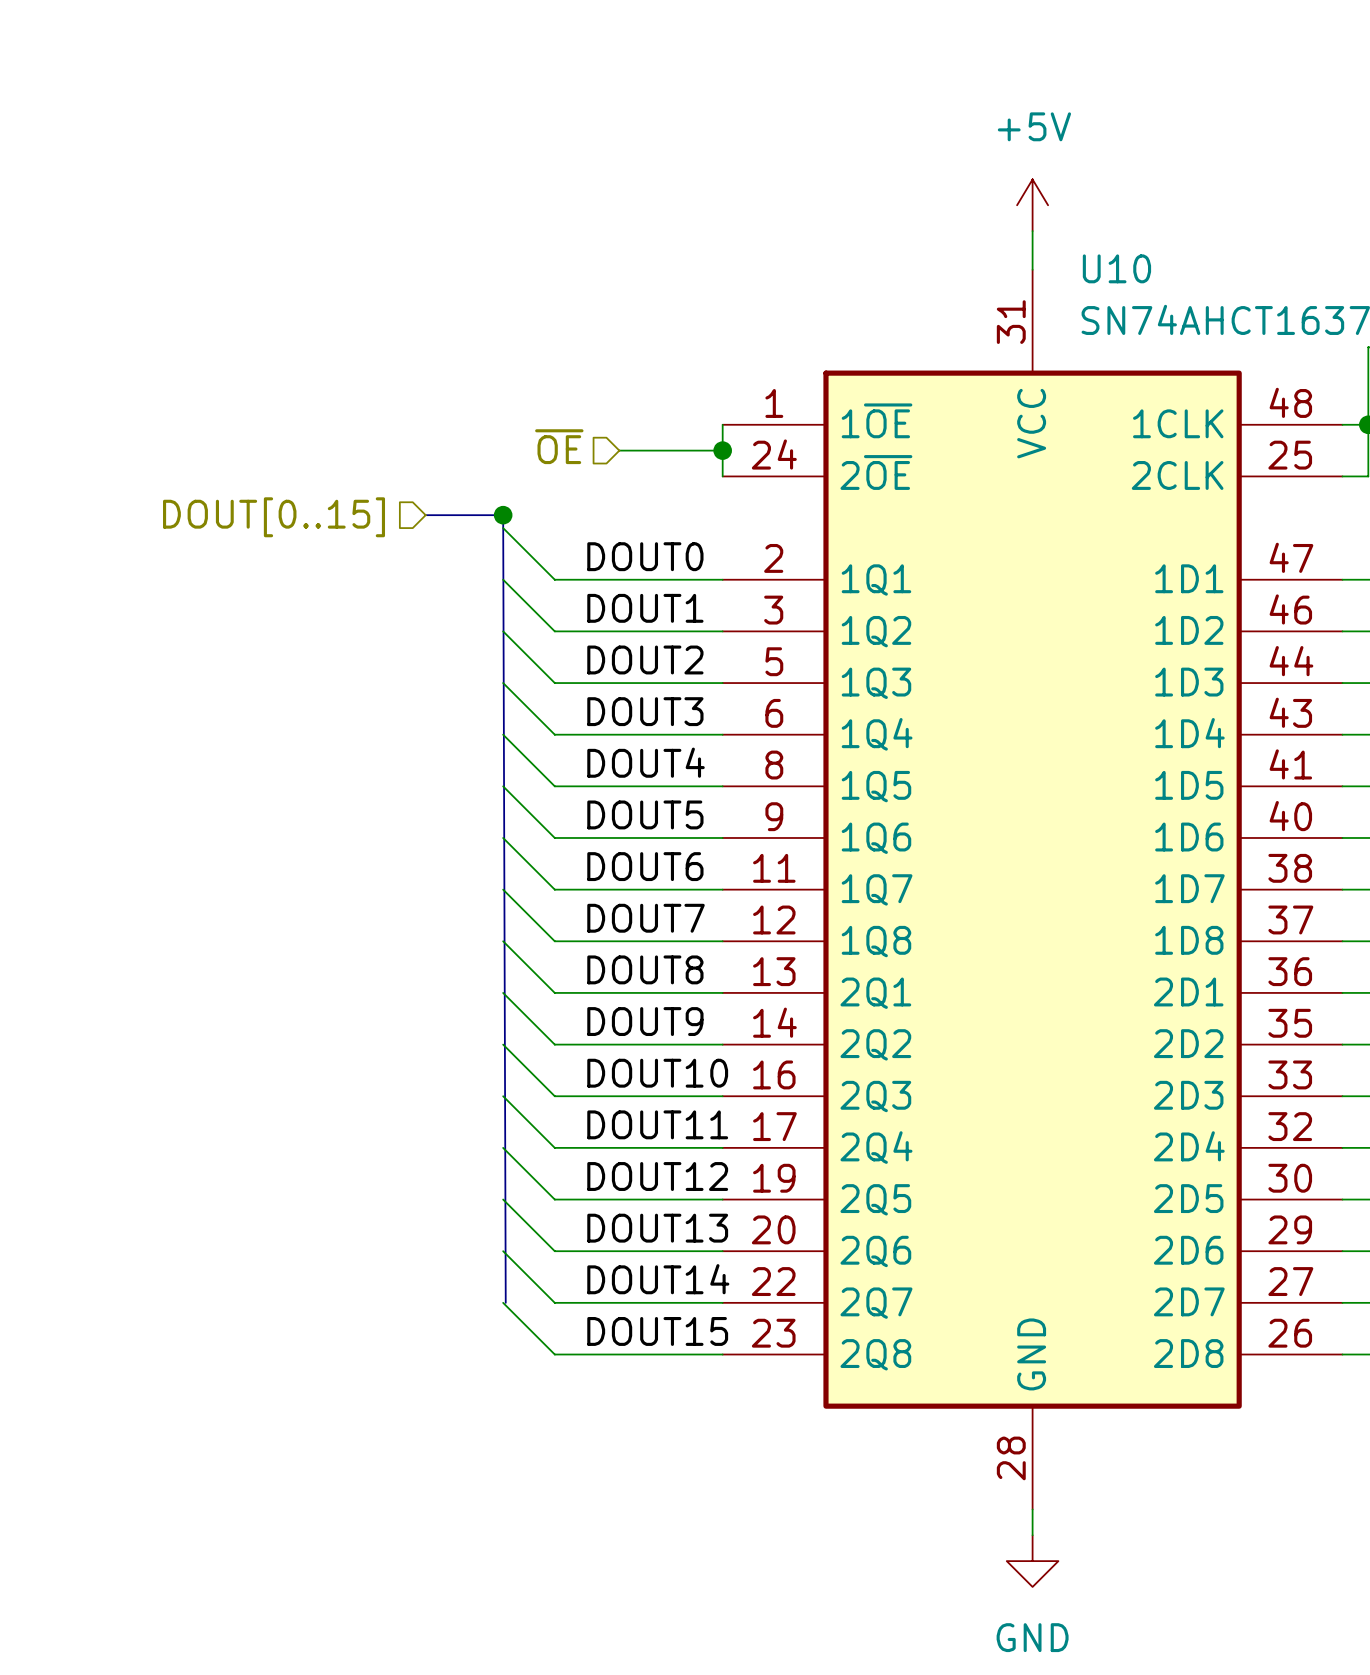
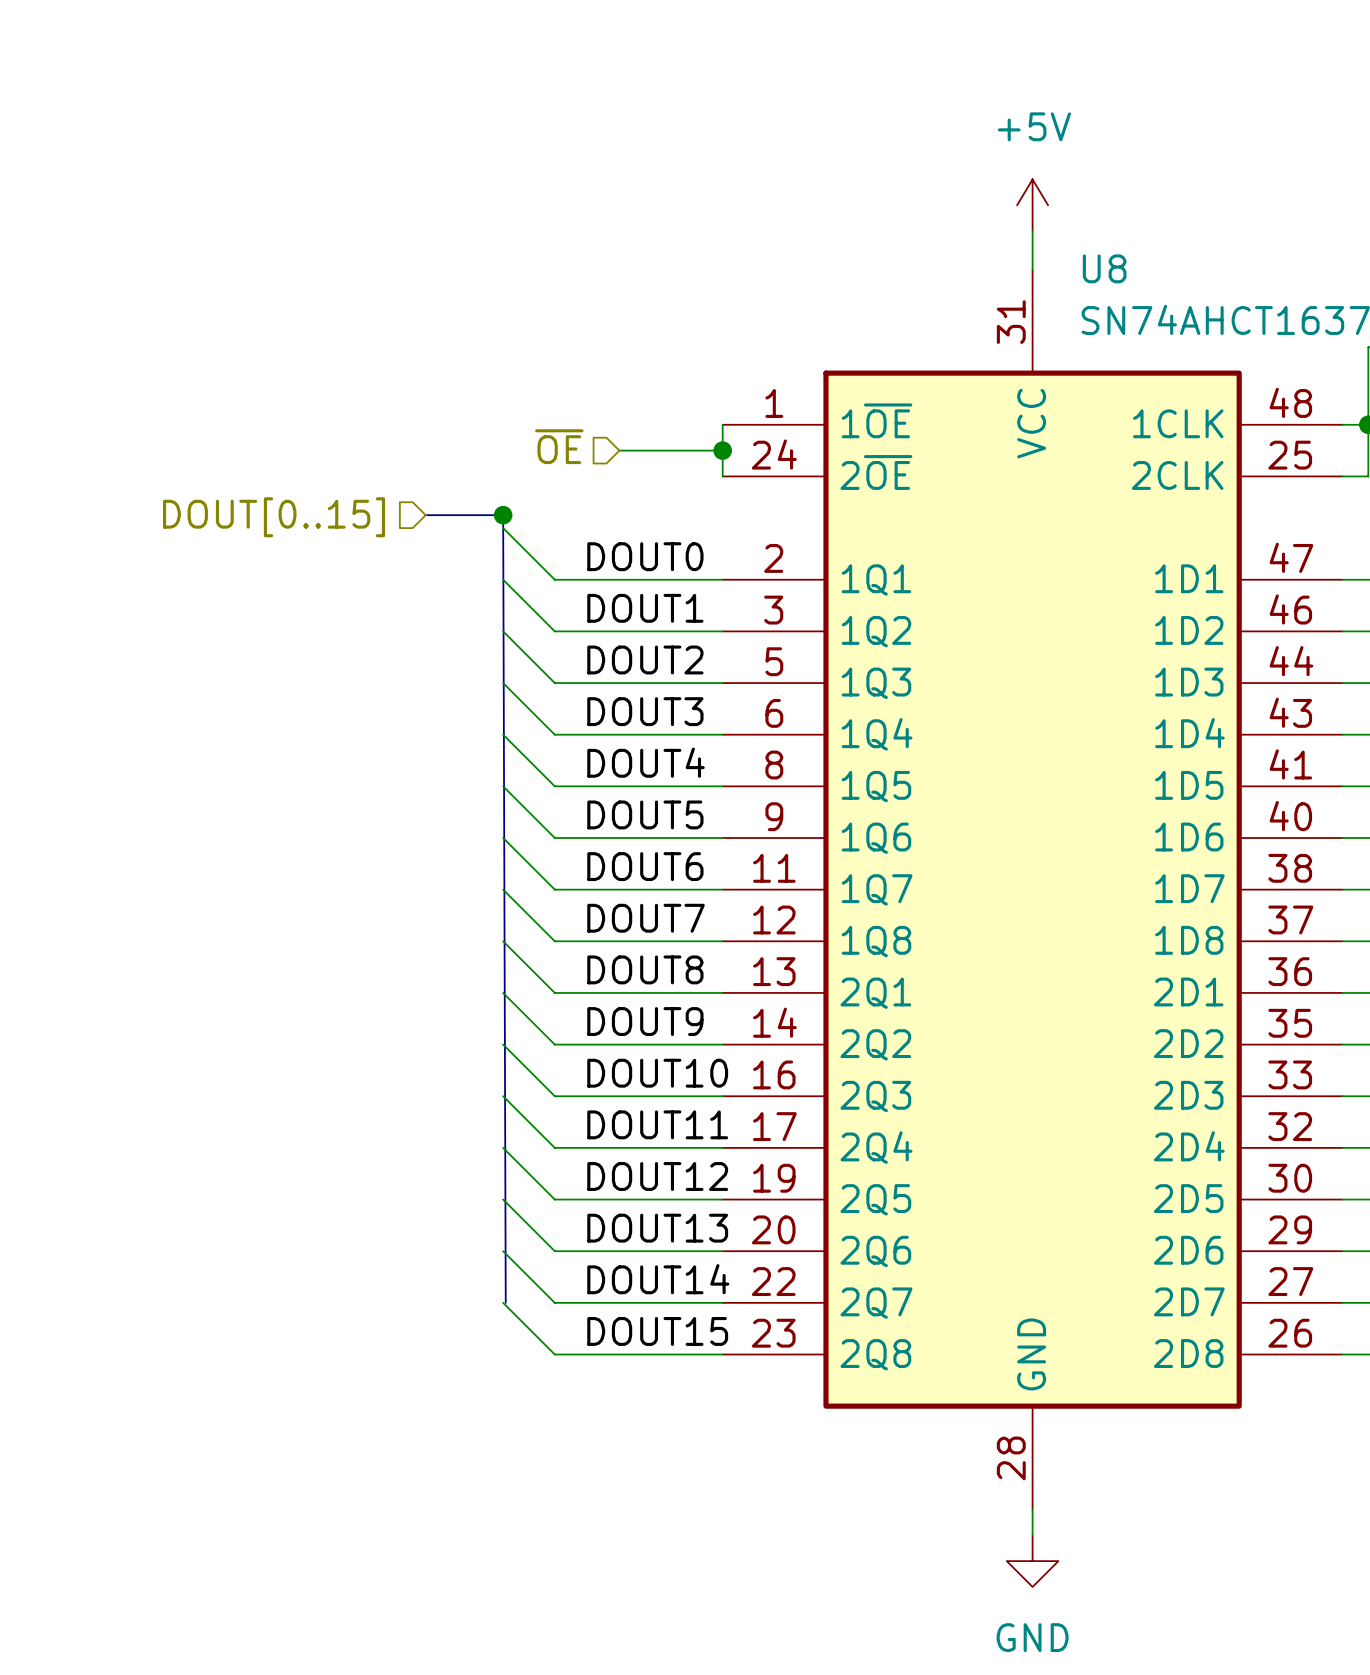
U10 name: U10 (1116, 268) -> U8 (1104, 268)

